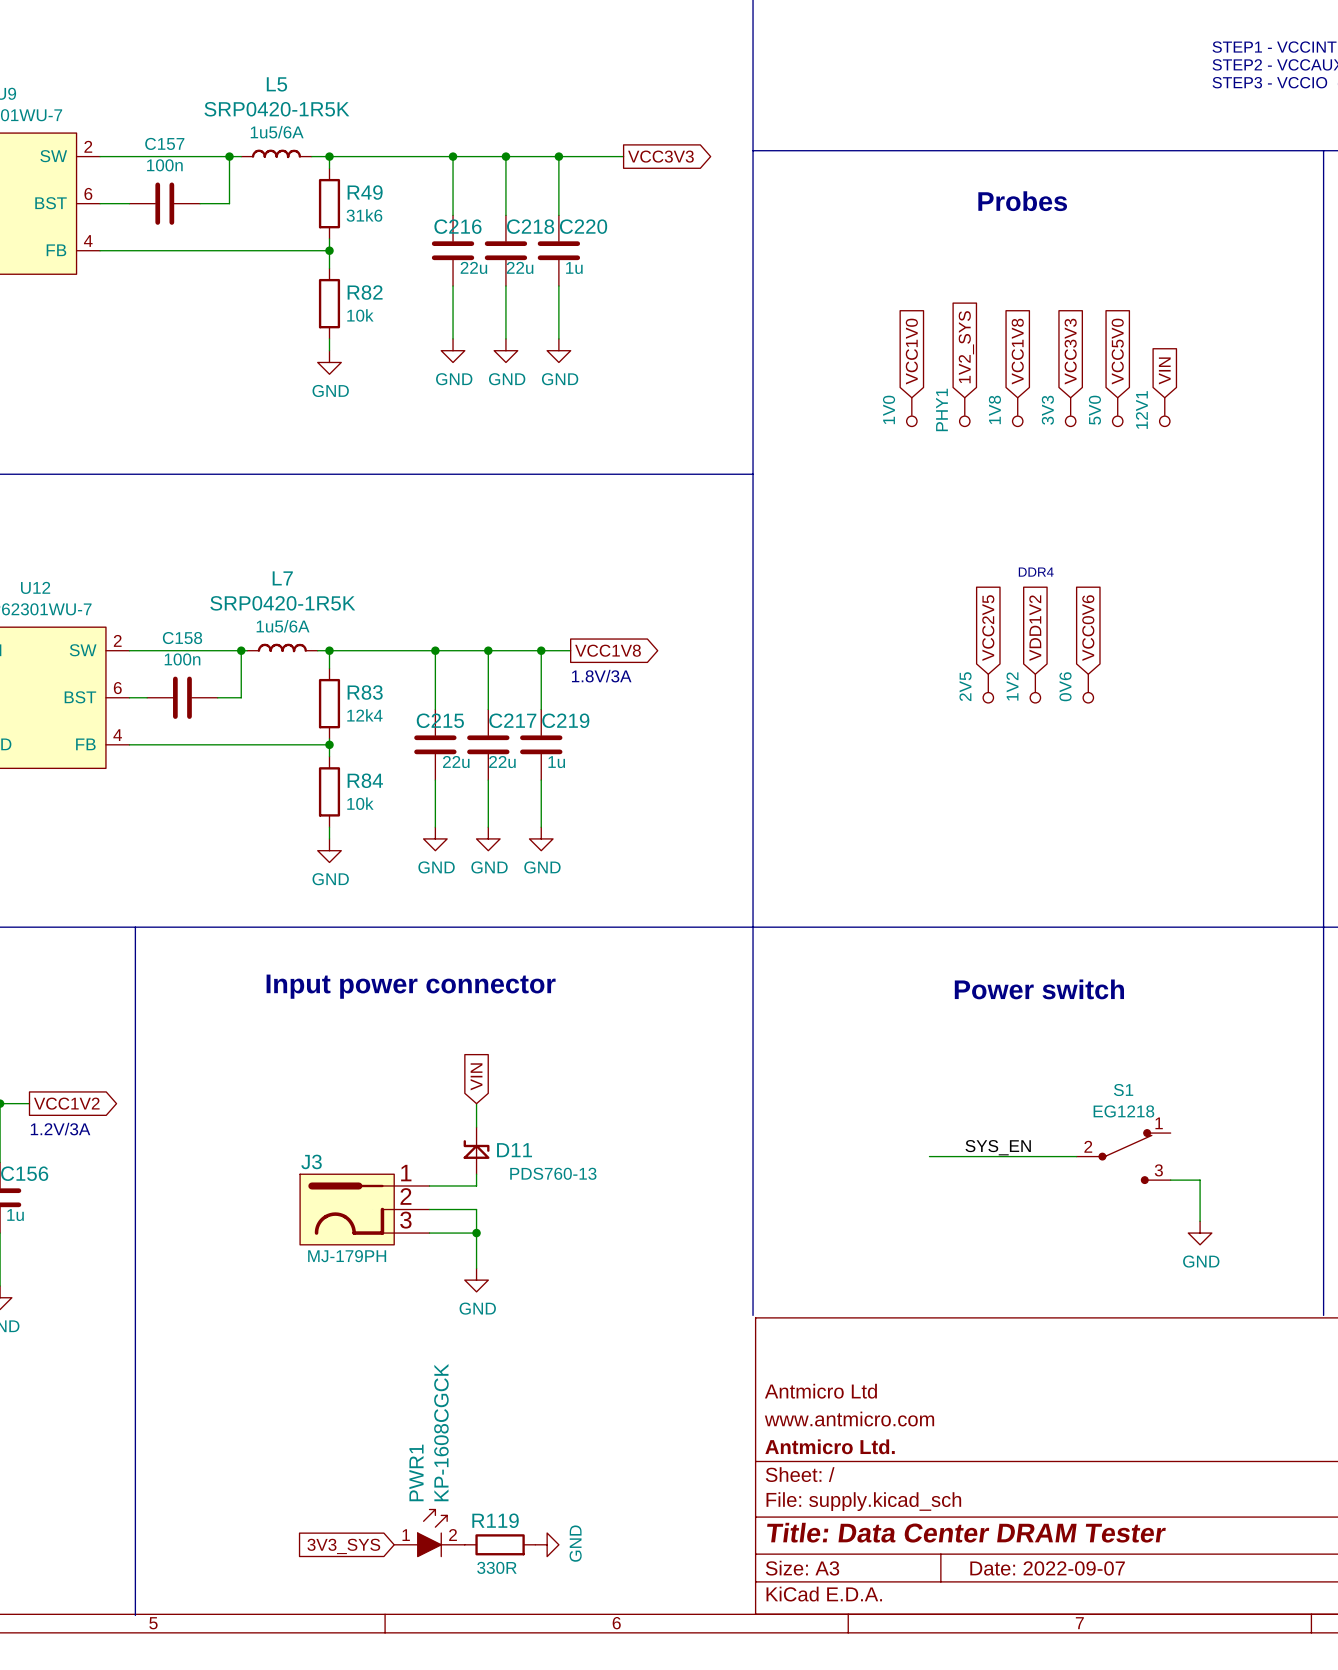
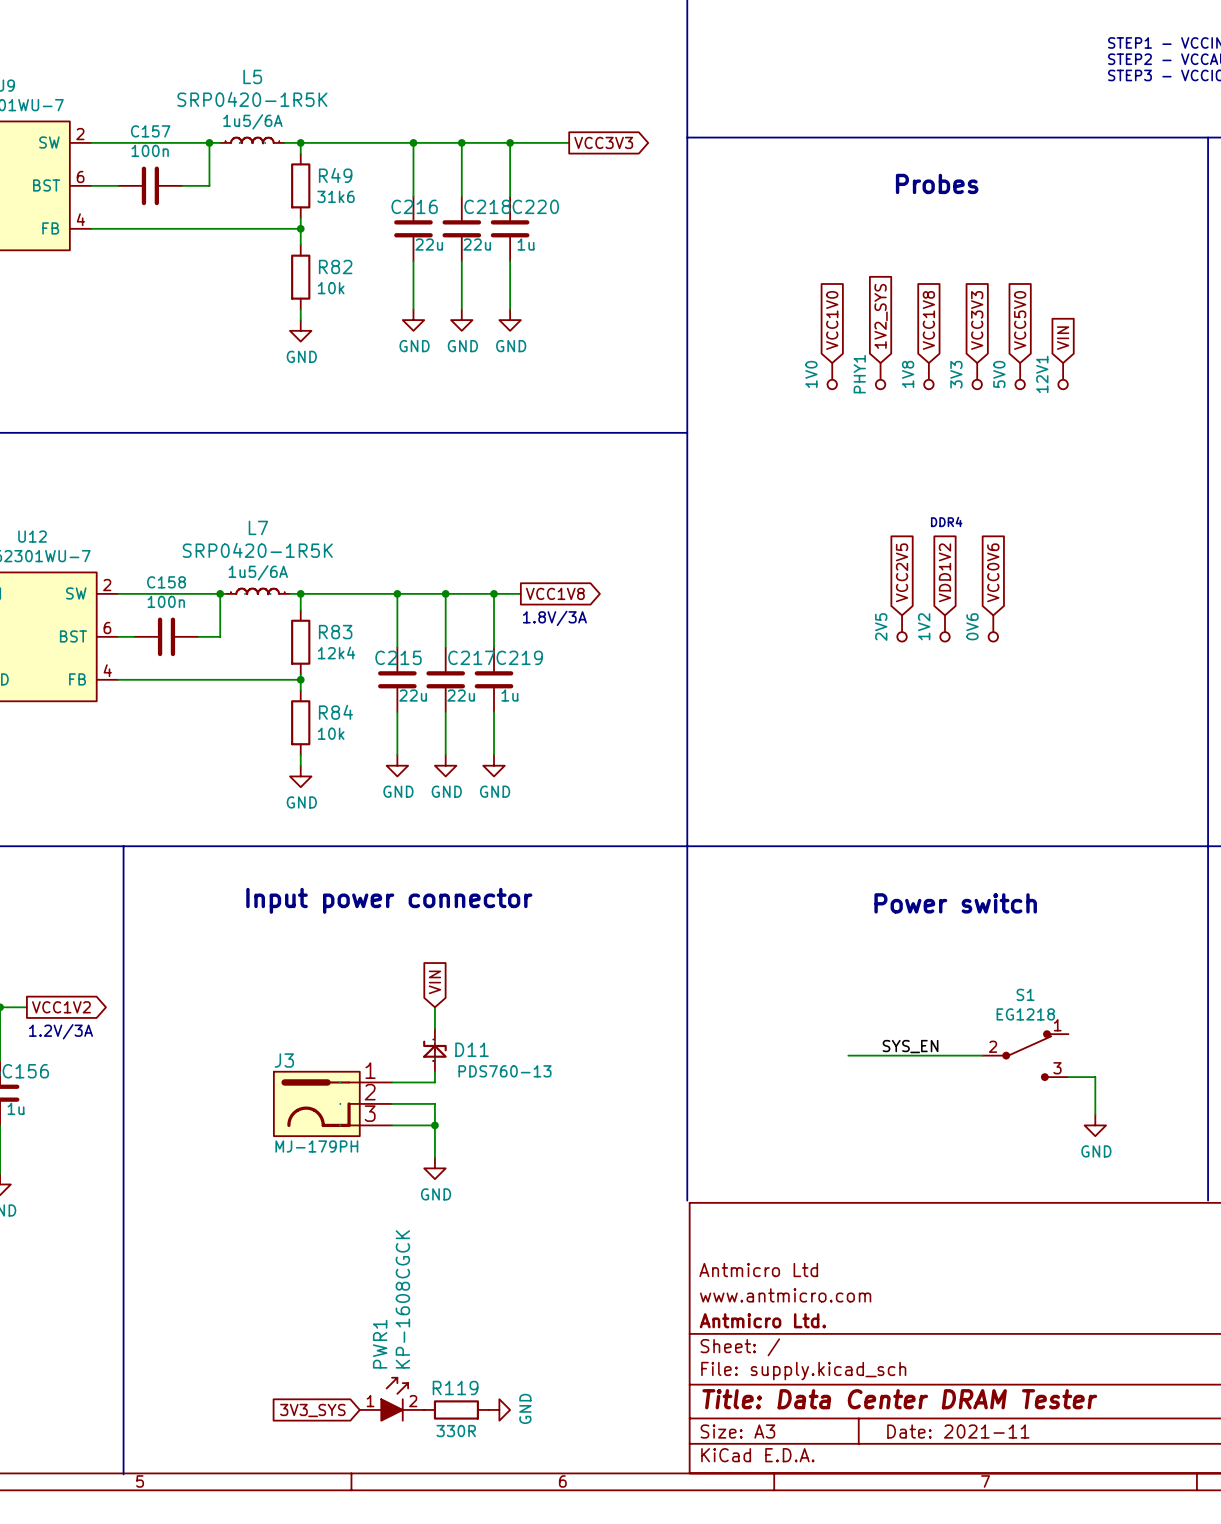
title block: Date: 2022-09-07 (1047, 1568) -> Date: 2021-11 (958, 1431)

